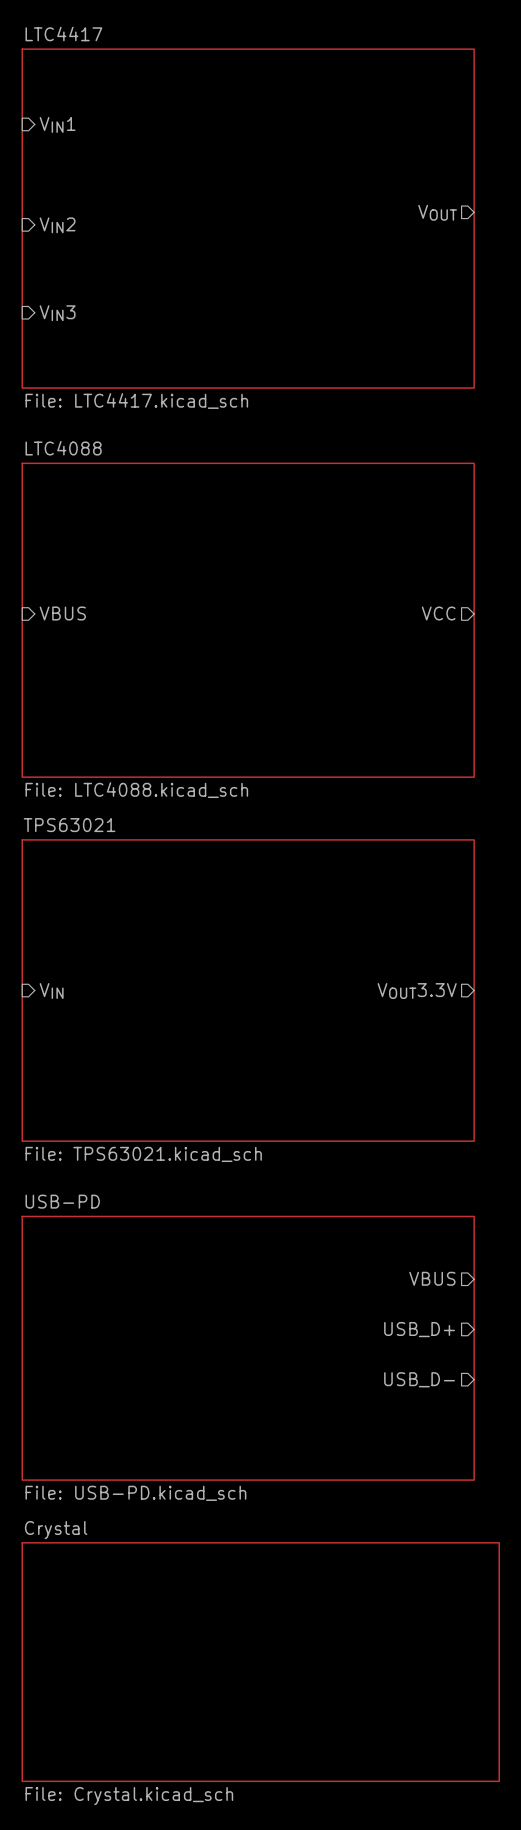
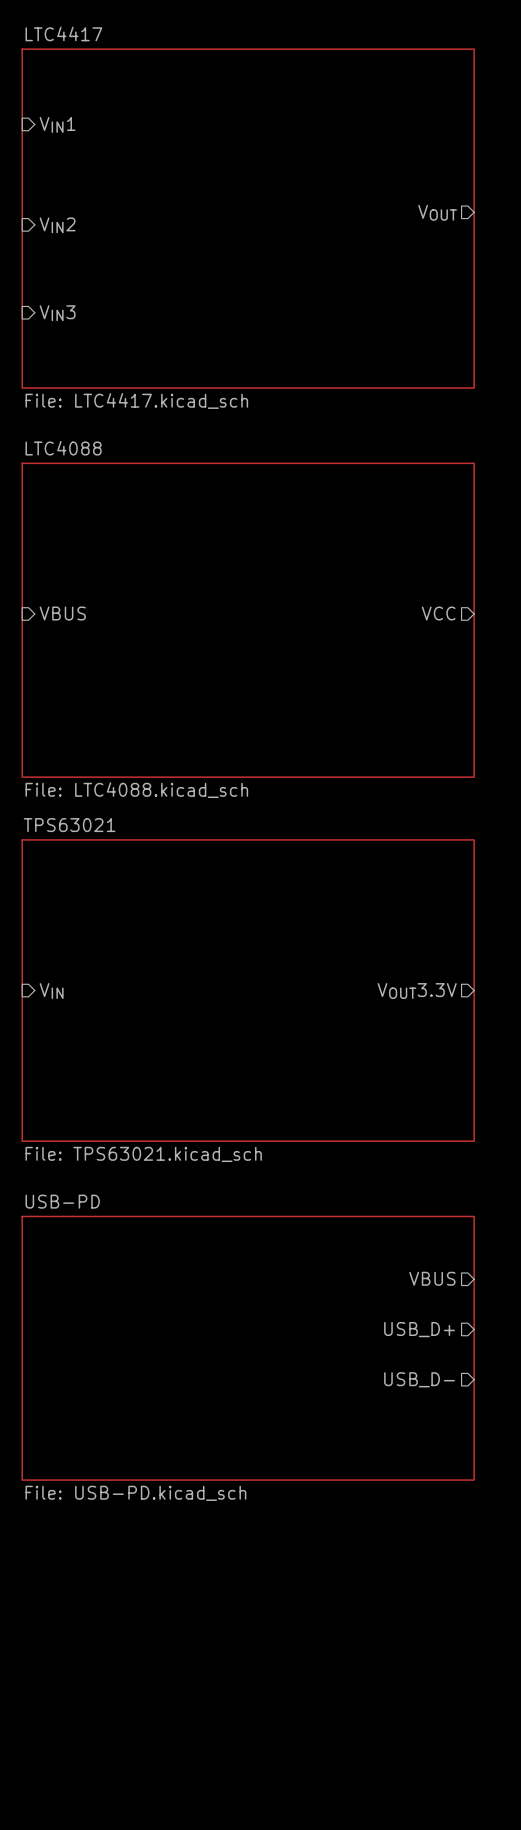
sheet Crystal: File: Crystal.kicad_sch (260, 1662) -> none

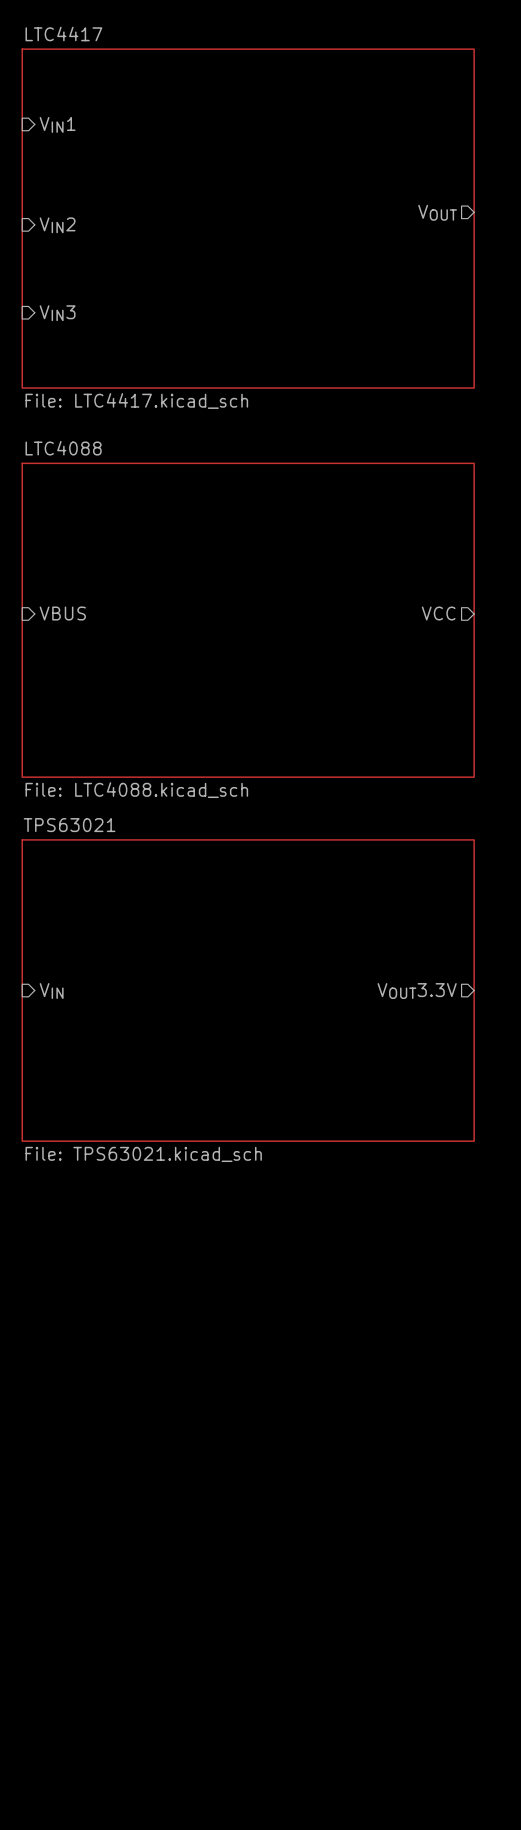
sheet pin: VBUS (432, 1278) -> none
sheet pin: USB_D+ (419, 1329) -> none
sheet USB-PD: File: USB-PD.kicad_sch (248, 1348) -> none
sheet pin: USB_D- (419, 1379) -> none

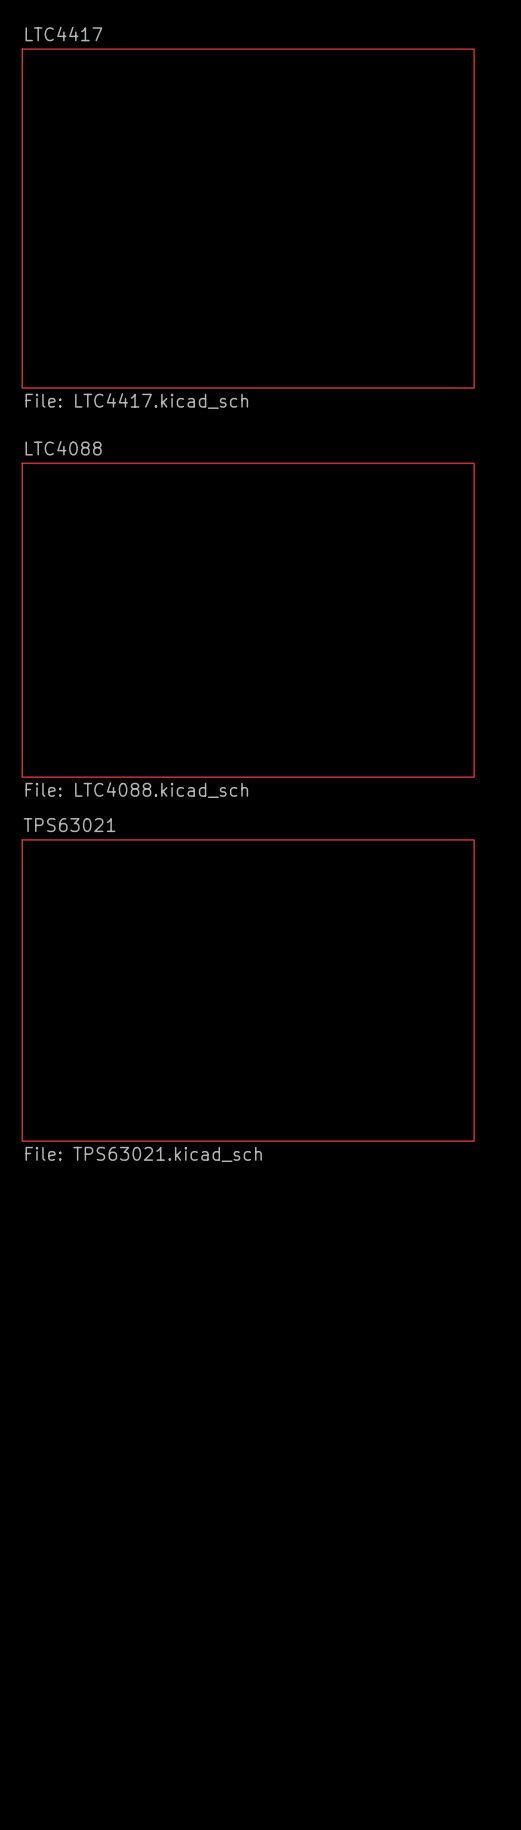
sheet pin: VIN1 (57, 124) -> none
sheet pin: VOUT (437, 212) -> none
sheet pin: VIN2 (57, 225) -> none
sheet pin: VIN3 (57, 313) -> none
sheet pin: VBUS (62, 613) -> none
sheet pin: VCC (438, 613) -> none
sheet pin: VIN (51, 991) -> none
sheet pin: VOUT3.3V (417, 991) -> none

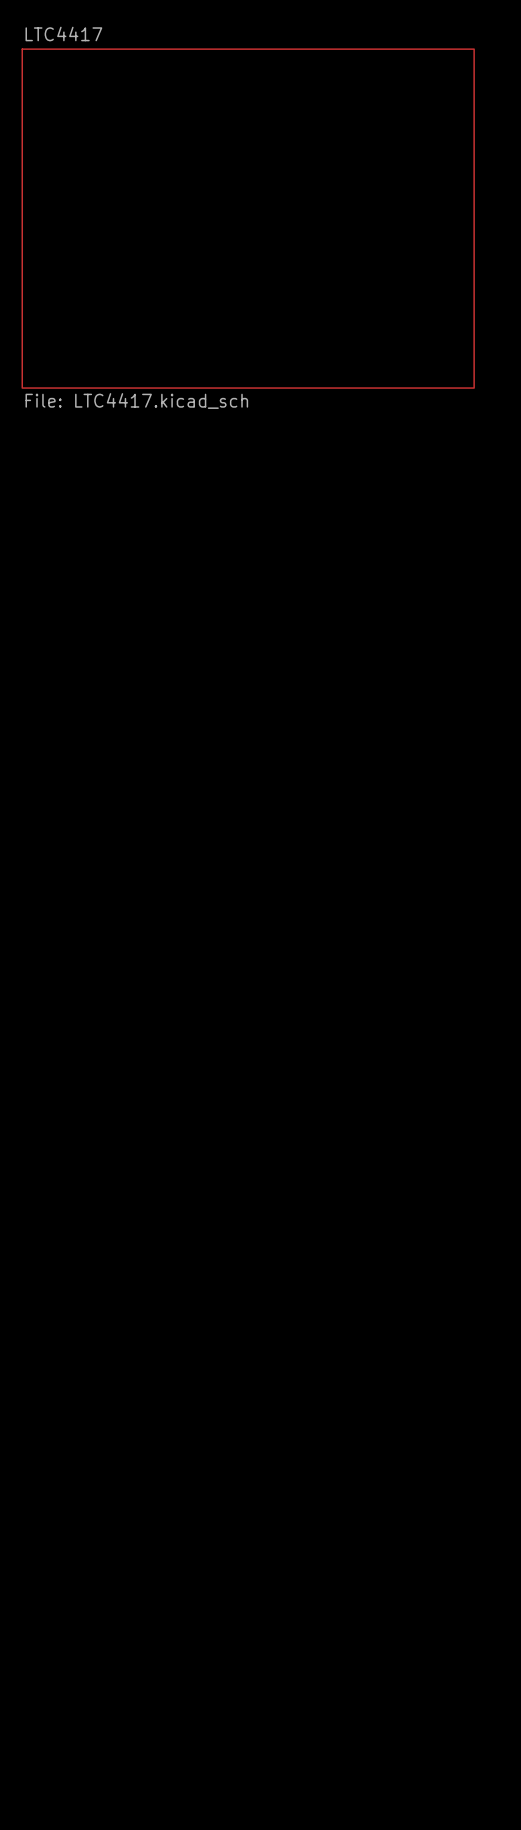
sheet LTC4088: File: LTC4088.kicad_sch (248, 620) -> none
sheet TPS63021: File: TPS63021.kicad_sch (248, 990) -> none

